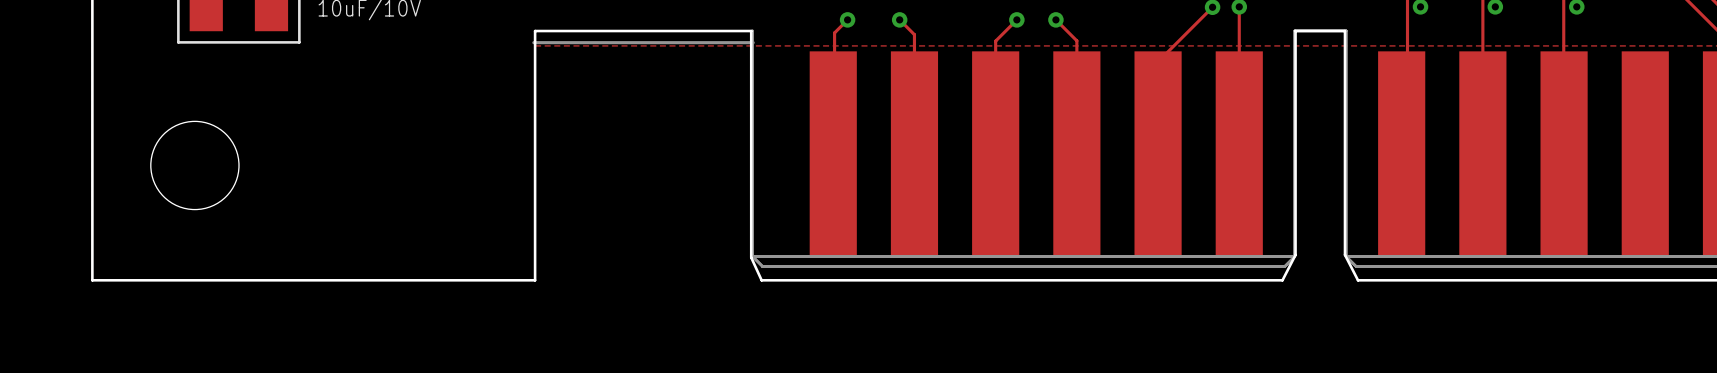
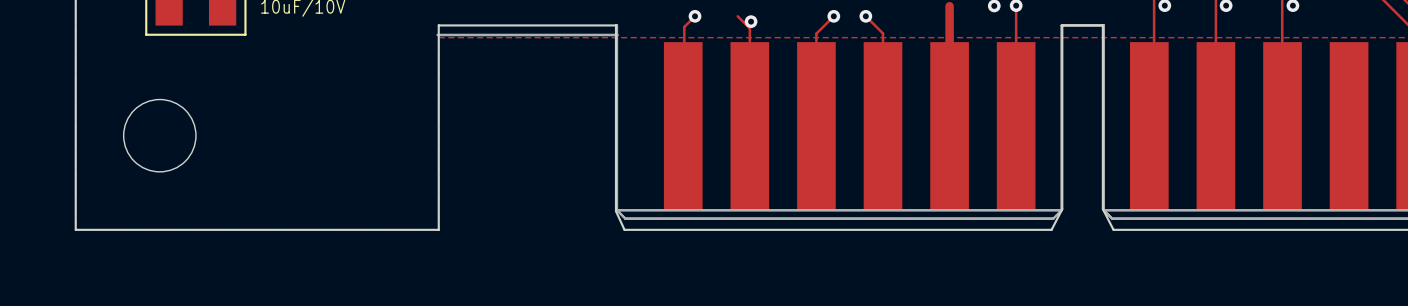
track: (1212, 7) (1158, 61) -> (949, 6) (949, 50)
via position: (899, 19) -> (751, 21)

